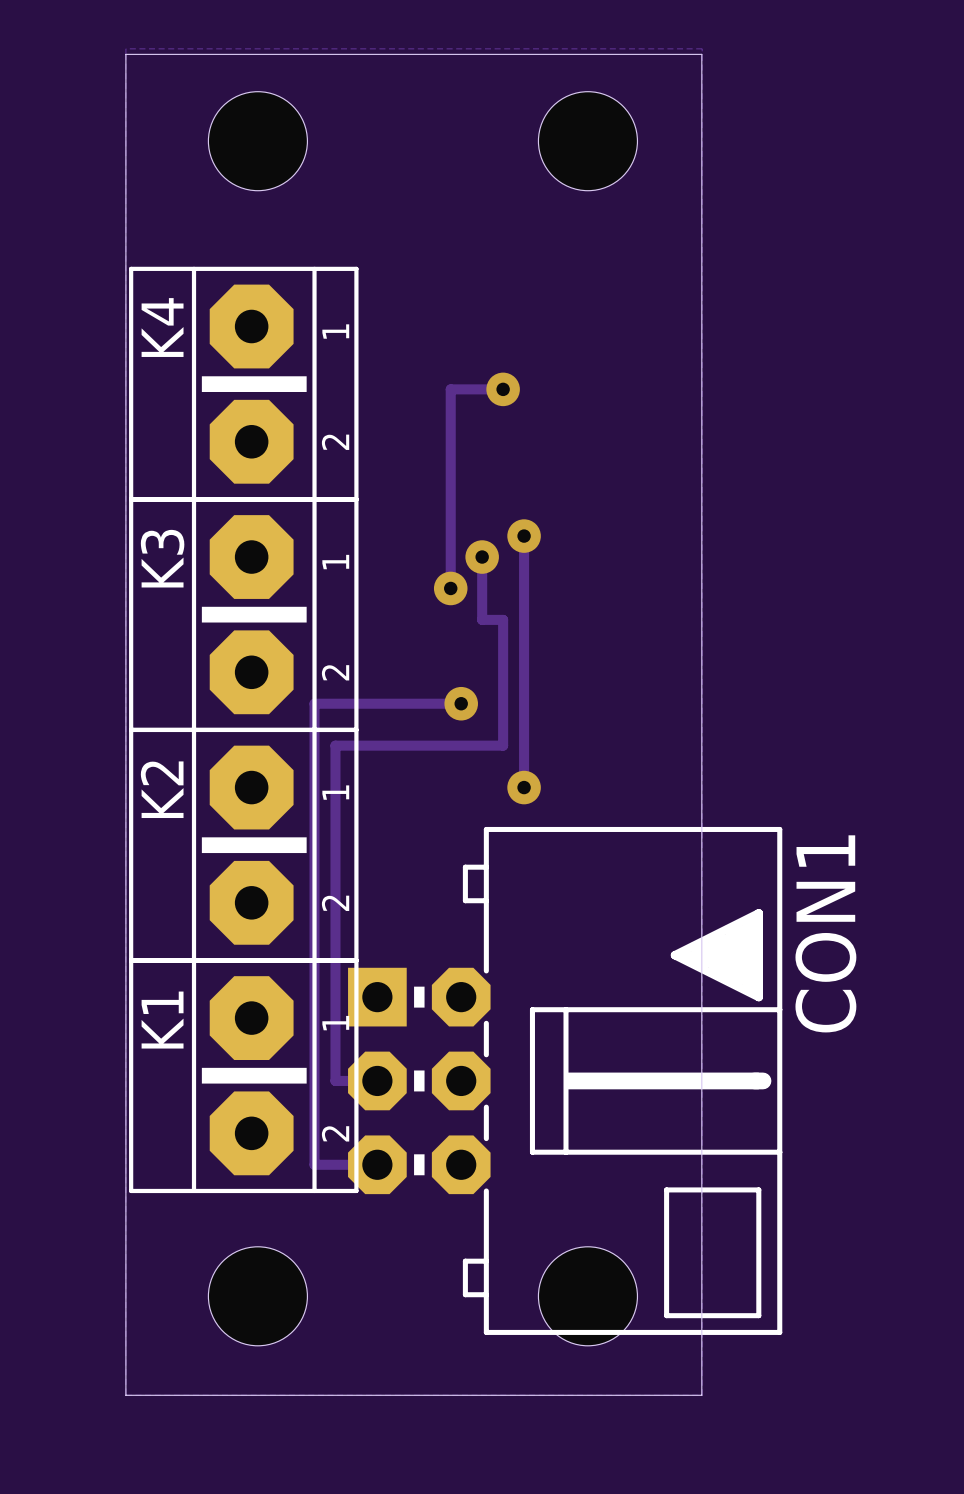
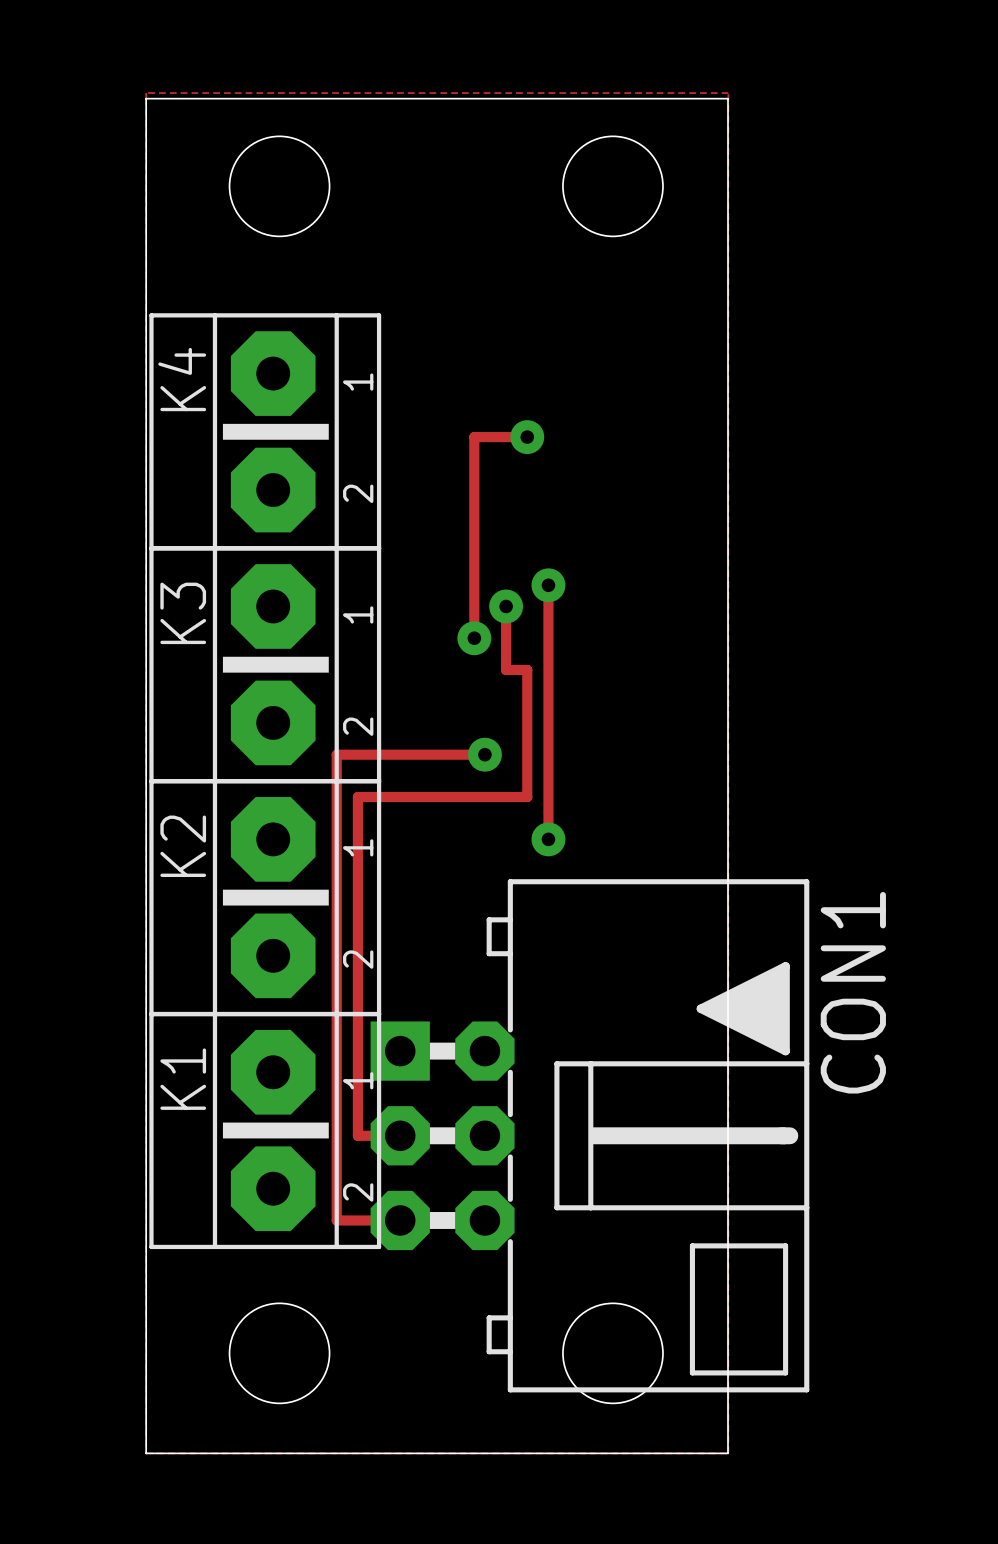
CON1 footprint: [348, 826, 783, 1335] -> [370, 879, 810, 1393]

